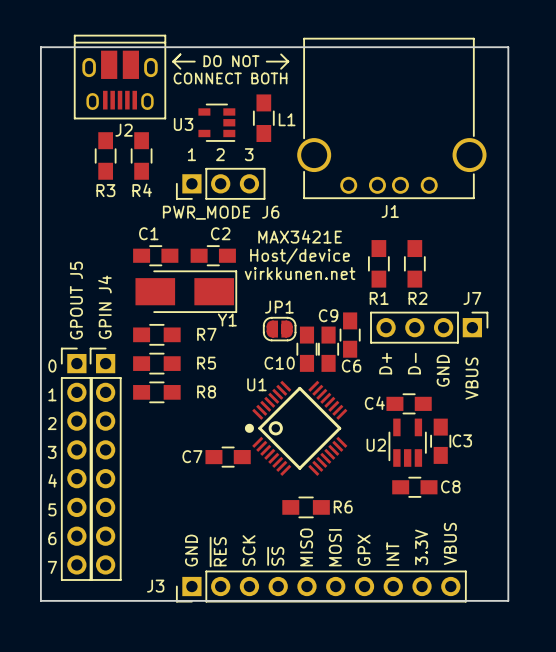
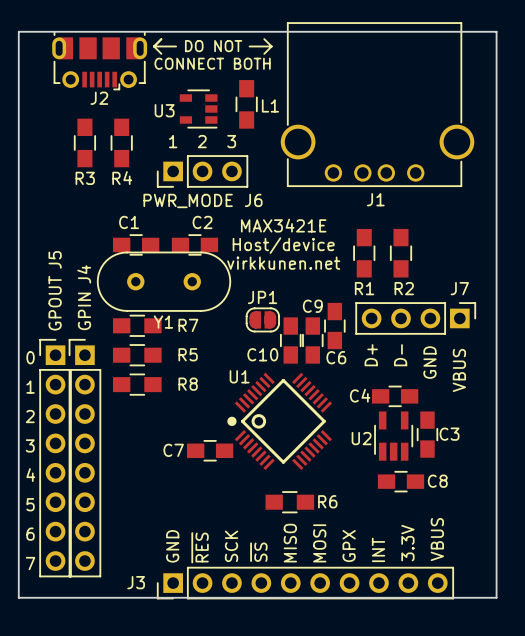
J2 footprint: [74, 34, 166, 120] -> [52, 31, 148, 91]
Y1 footprint: [135, 270, 237, 313] -> [97, 251, 231, 312]
Y1 name position: Y1 (227, 320) -> Y1 (163, 322)

